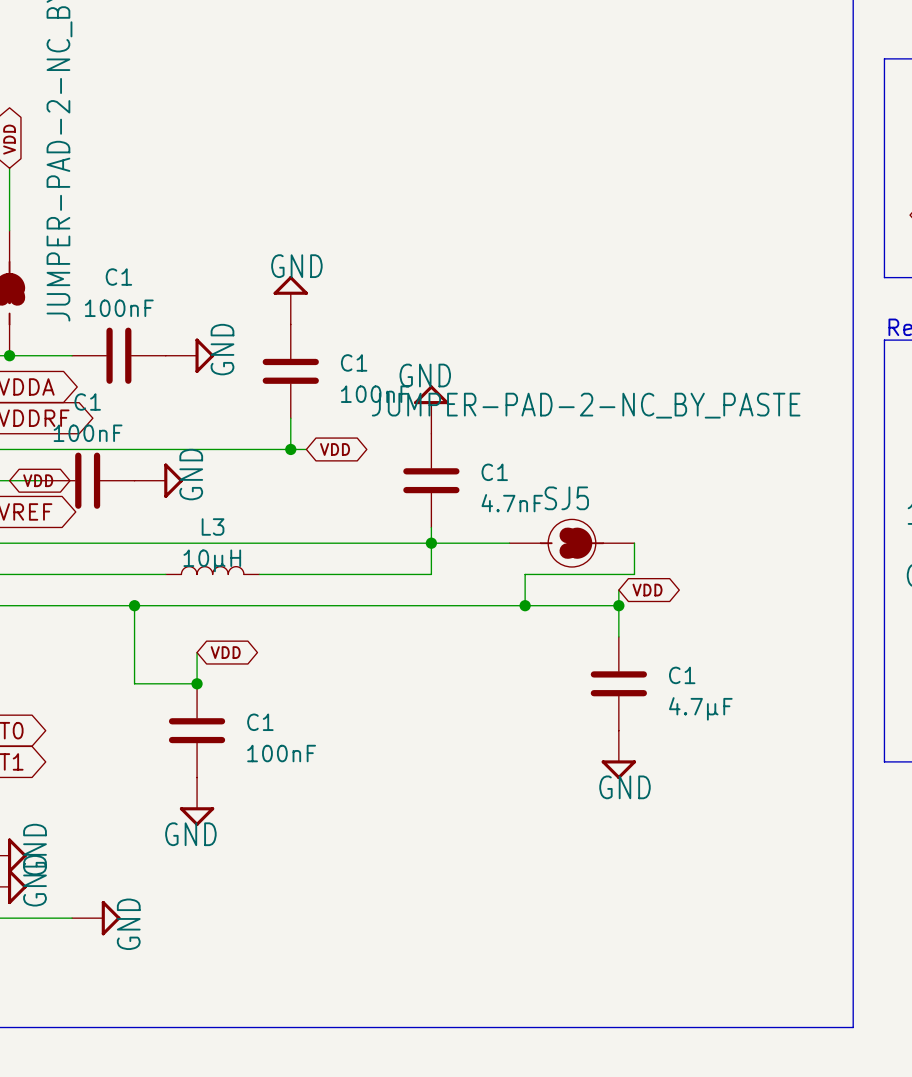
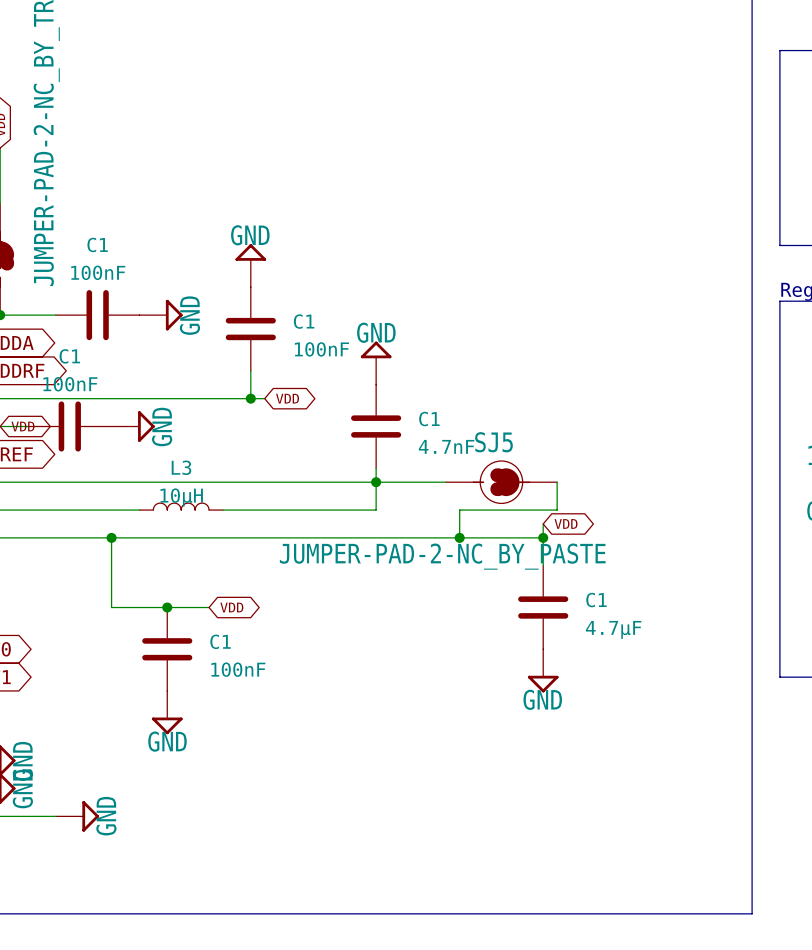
SJ5 value position: JUMPER-PAD-2-NC_BY_PASTE (586, 405) -> JUMPER-PAD-2-NC_BY_PASTE (442, 556)
wire: (197, 652) (197, 683) -> (209, 607) (167, 607)
global label position: VDD (225, 652) -> VDD (231, 607)

